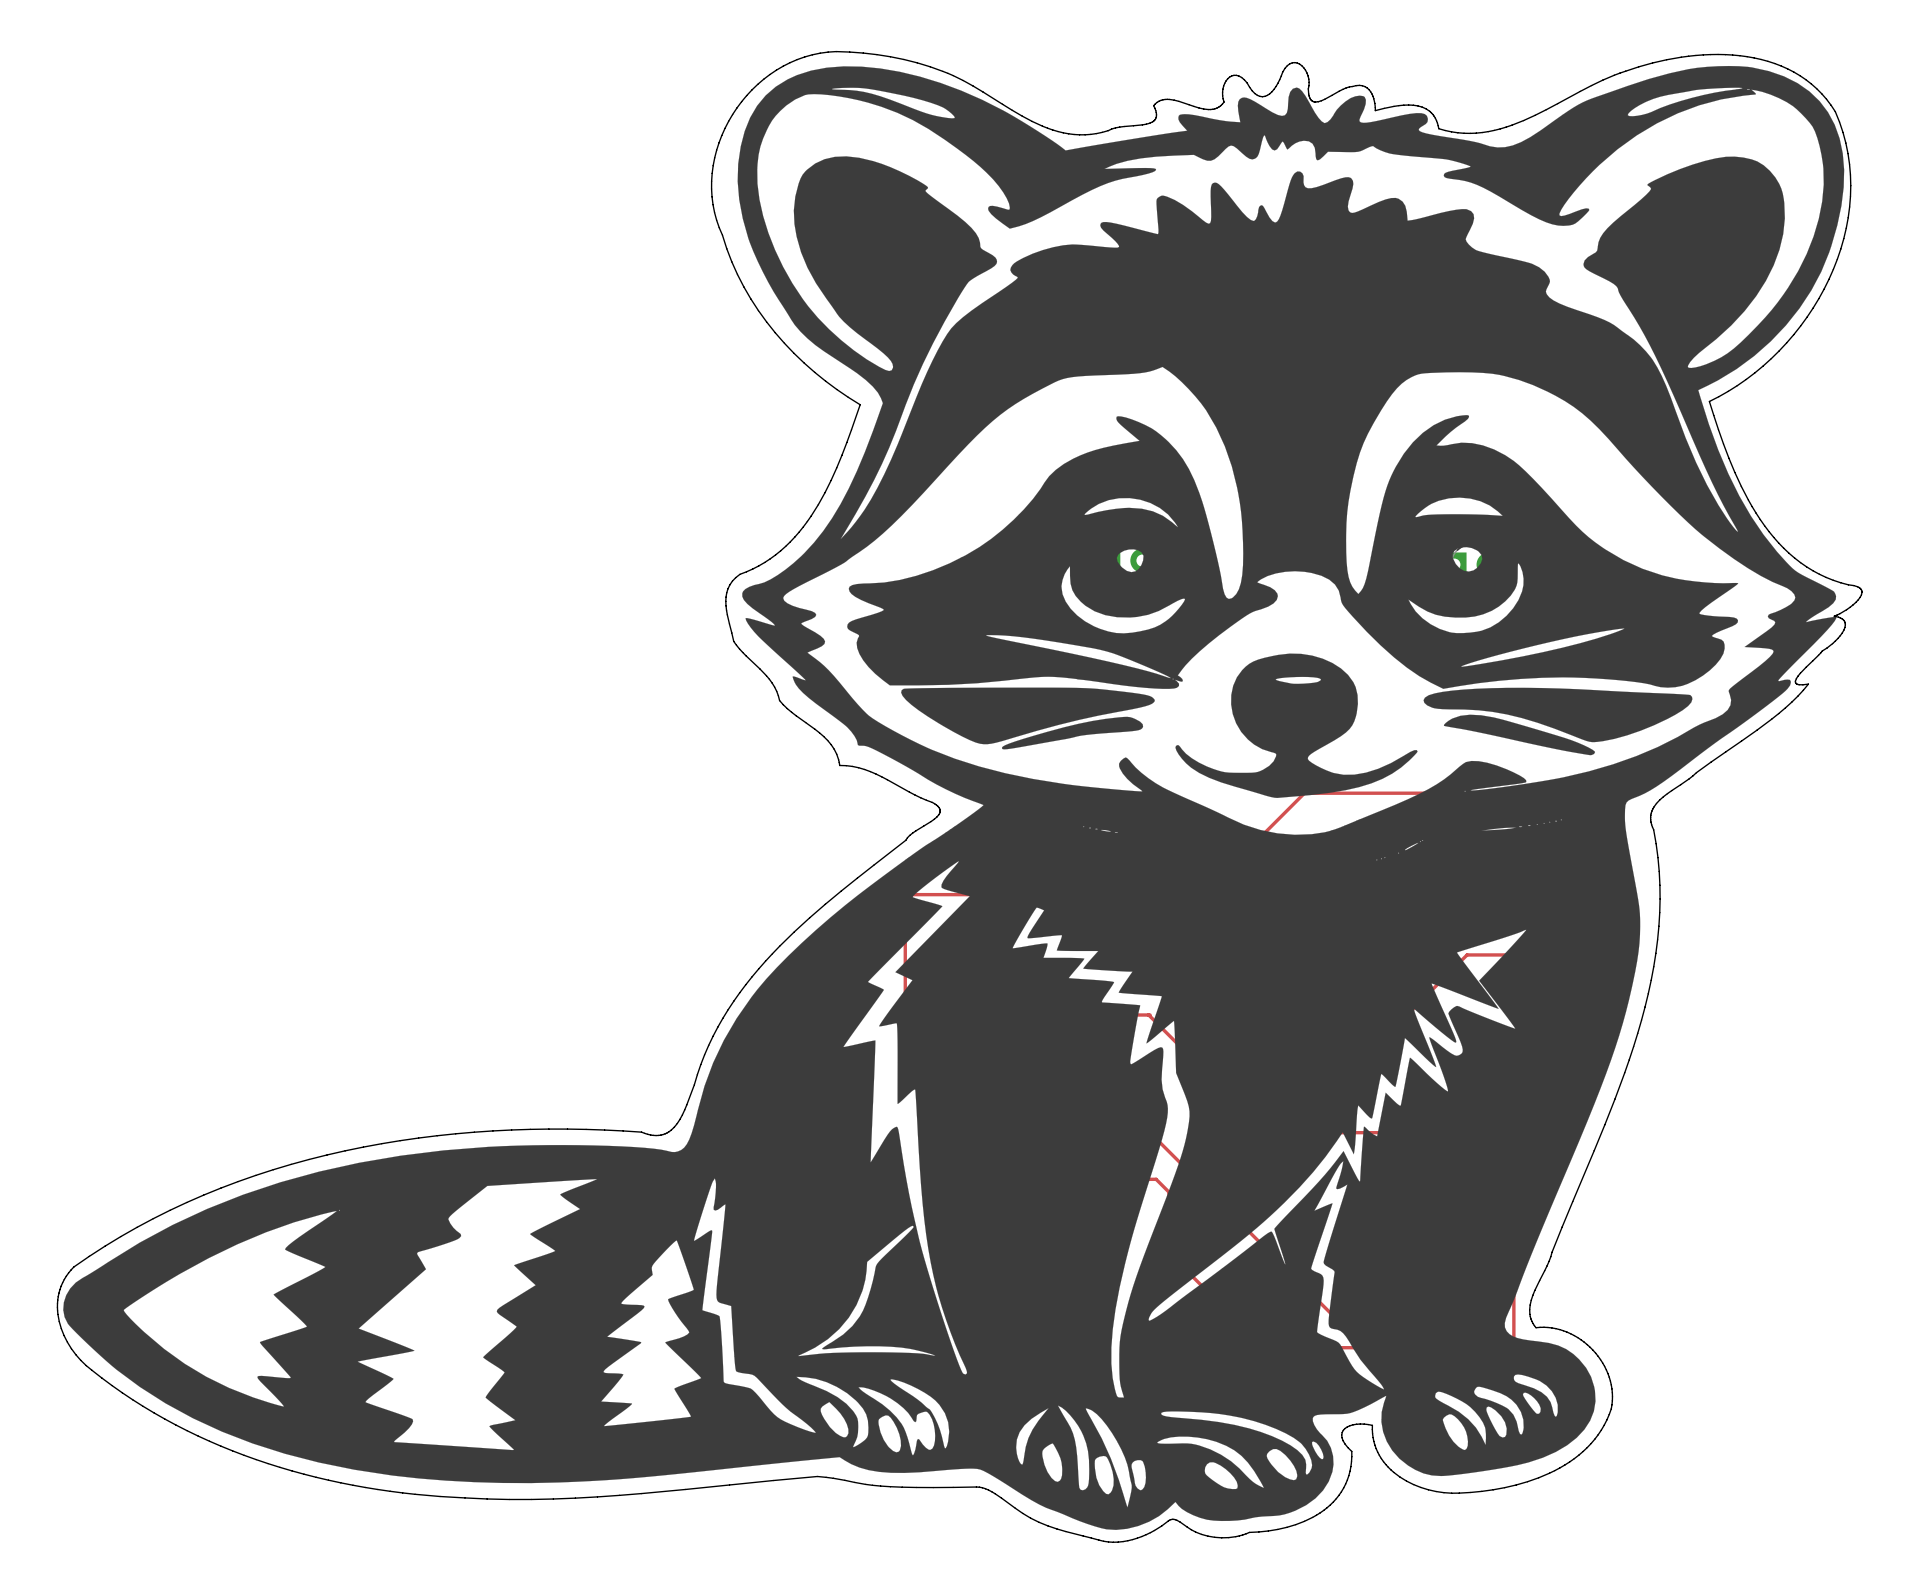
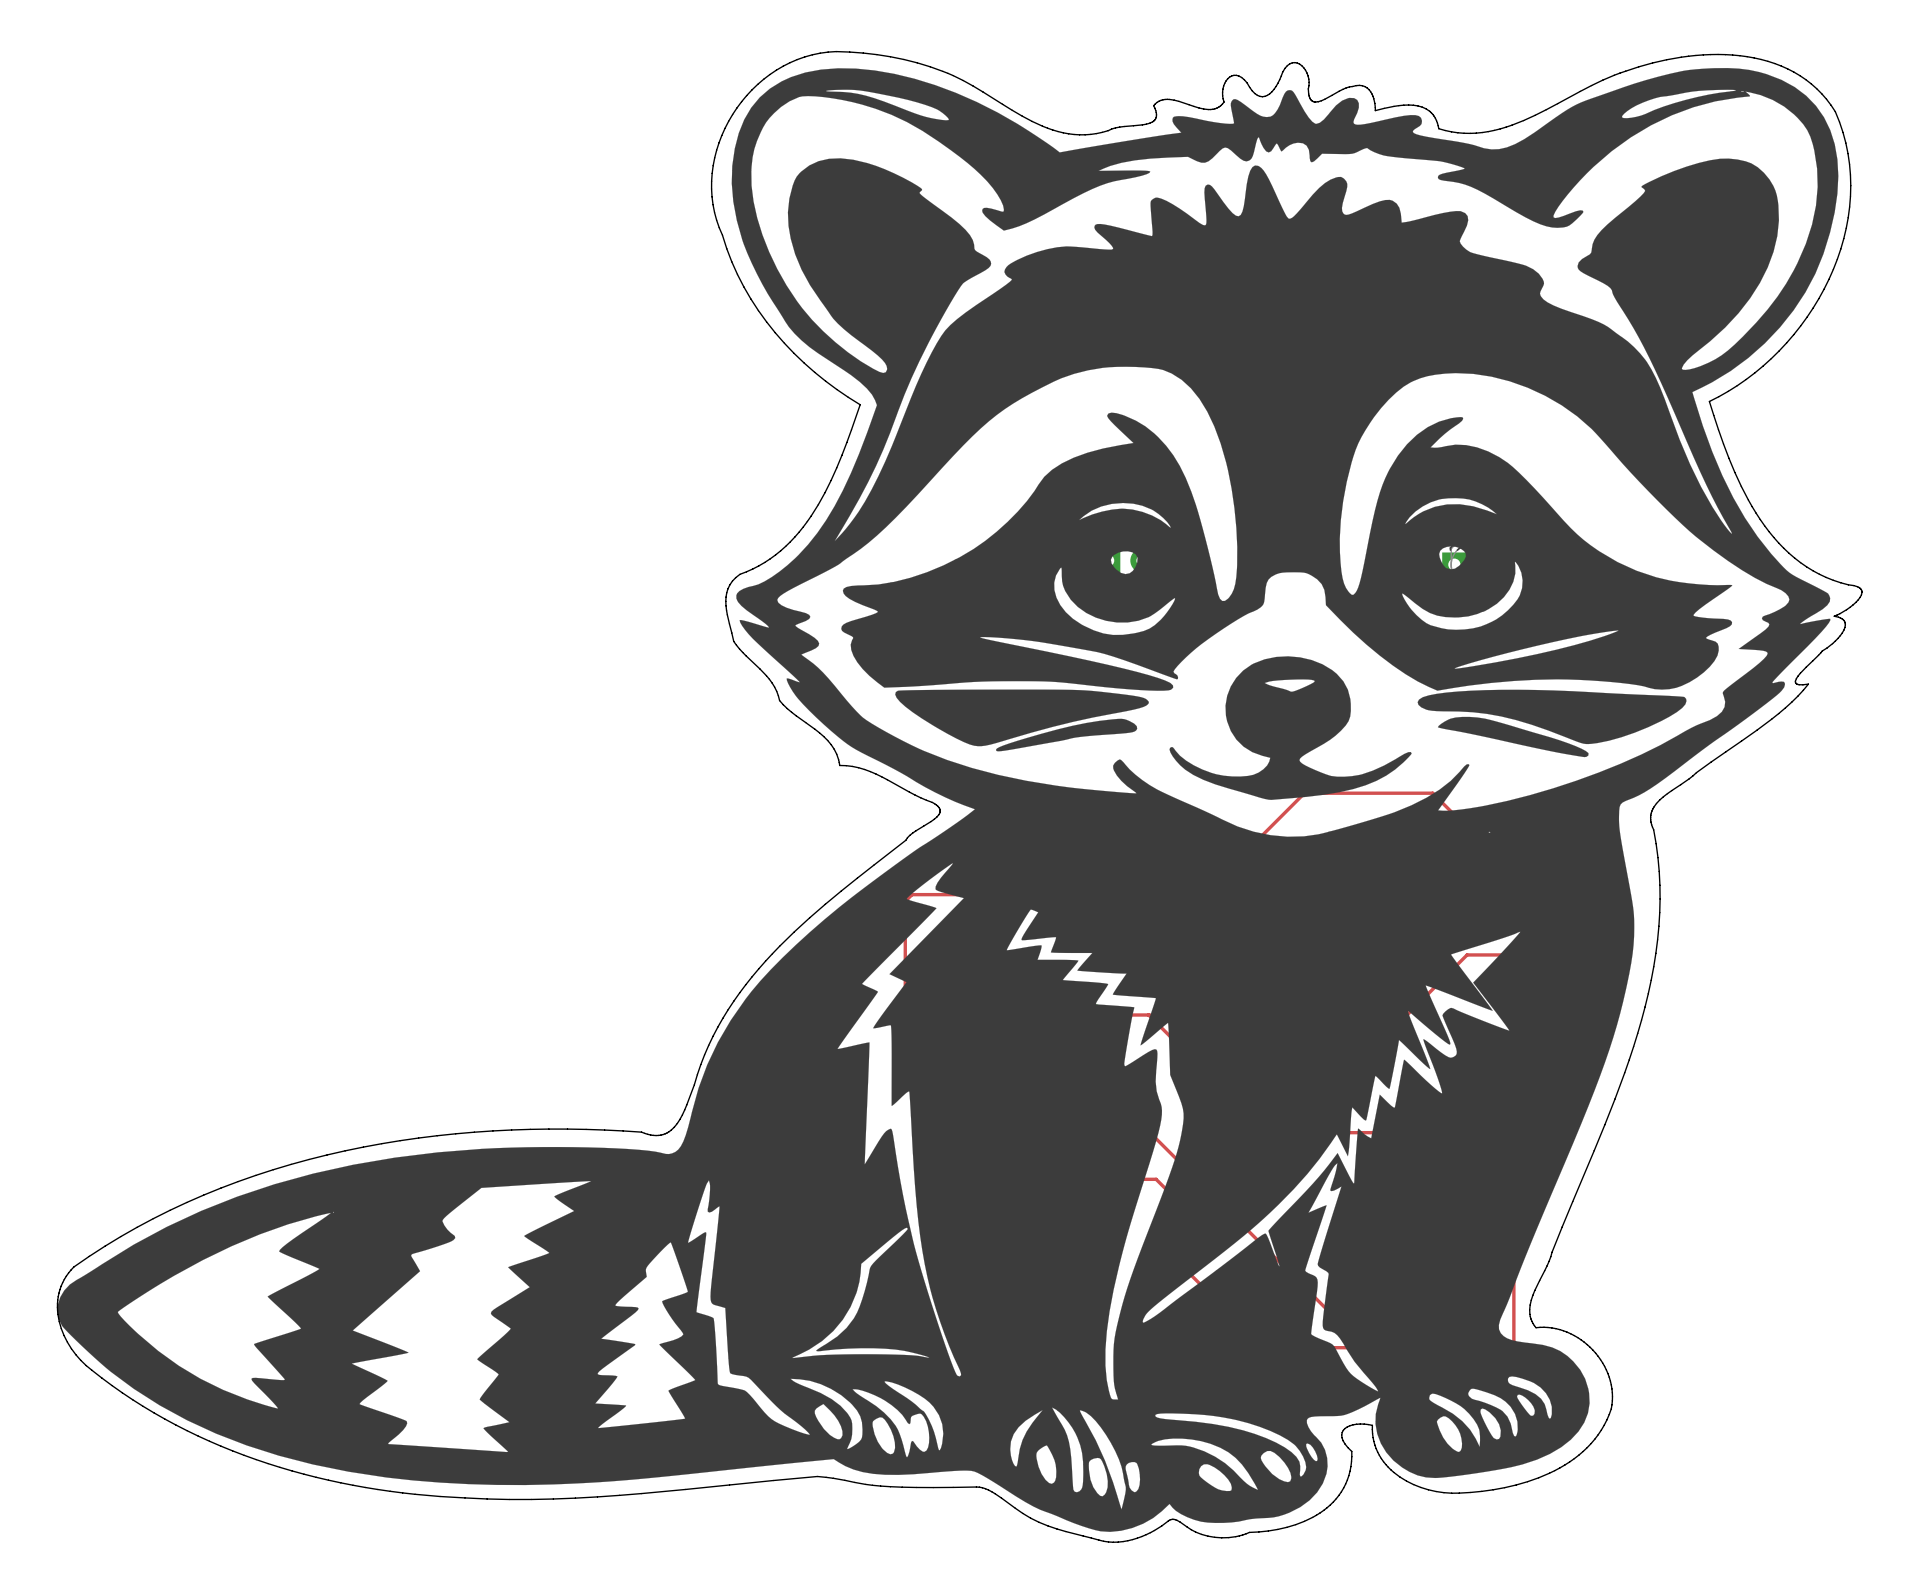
drawing shape: [63, 65, 1845, 1530] -> [57, 68, 1839, 1532]

